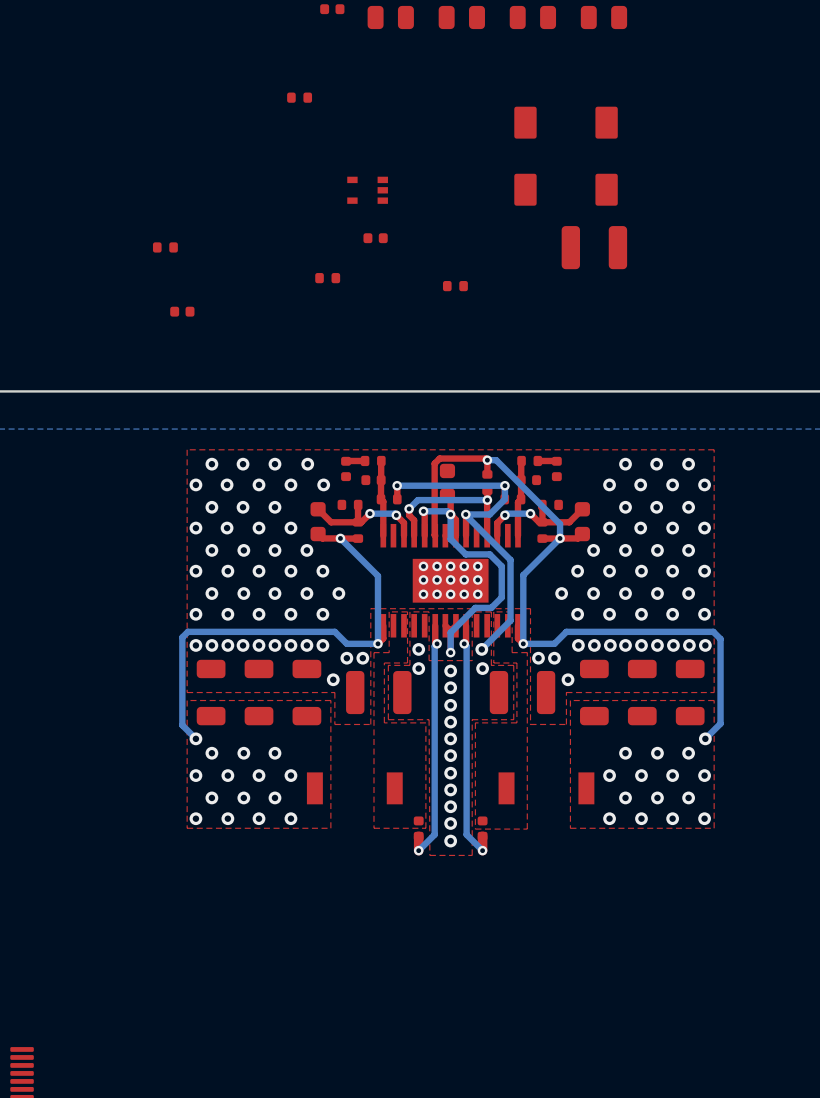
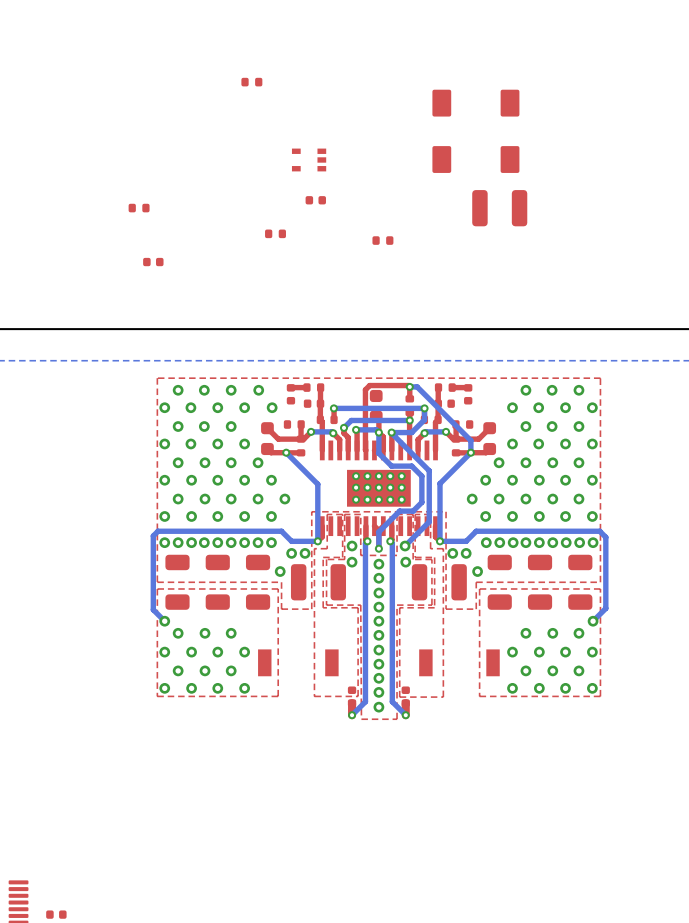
part: (332, 9) -> none
part: (390, 17) -> none
part: (461, 17) -> none
part: (532, 17) -> none
part: (603, 17) -> none
part: none -> (56, 914)

